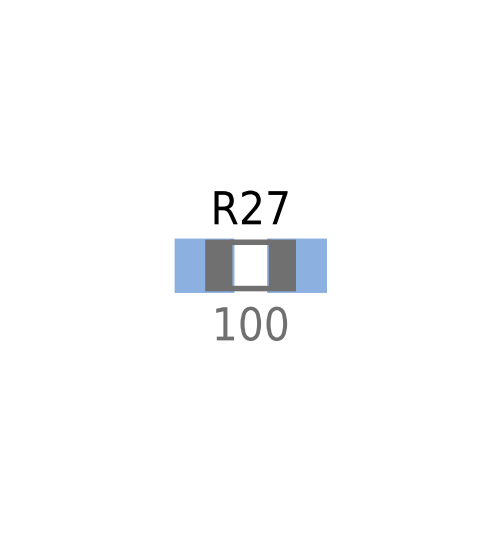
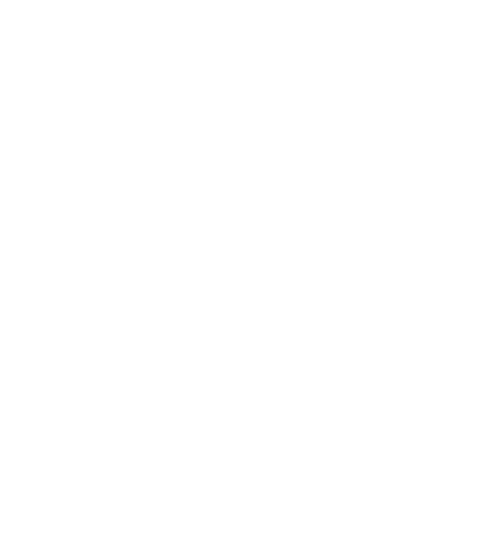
R27: 100 (250, 265) -> none

